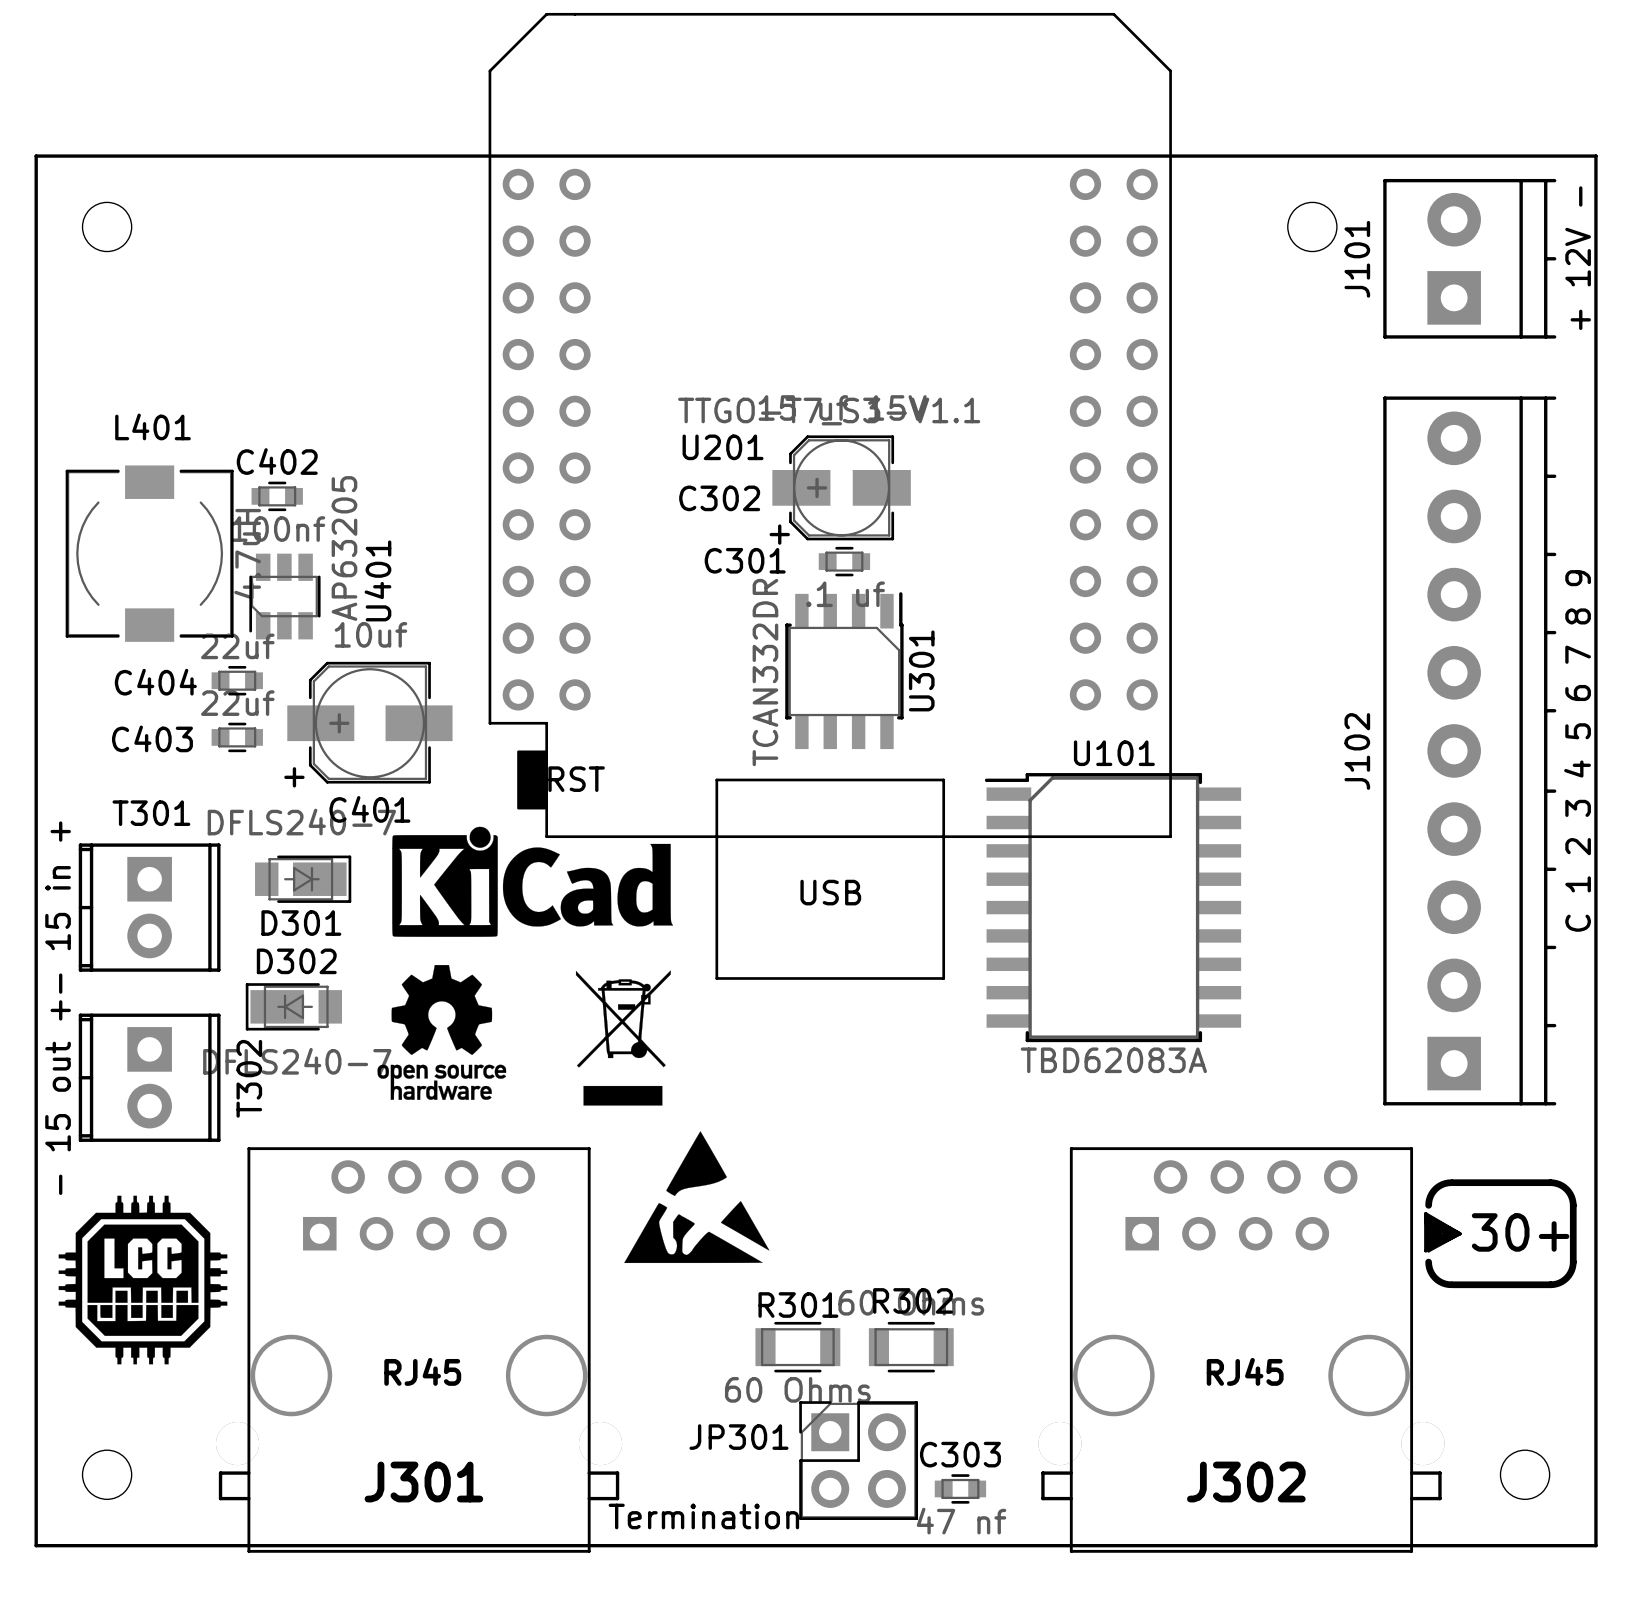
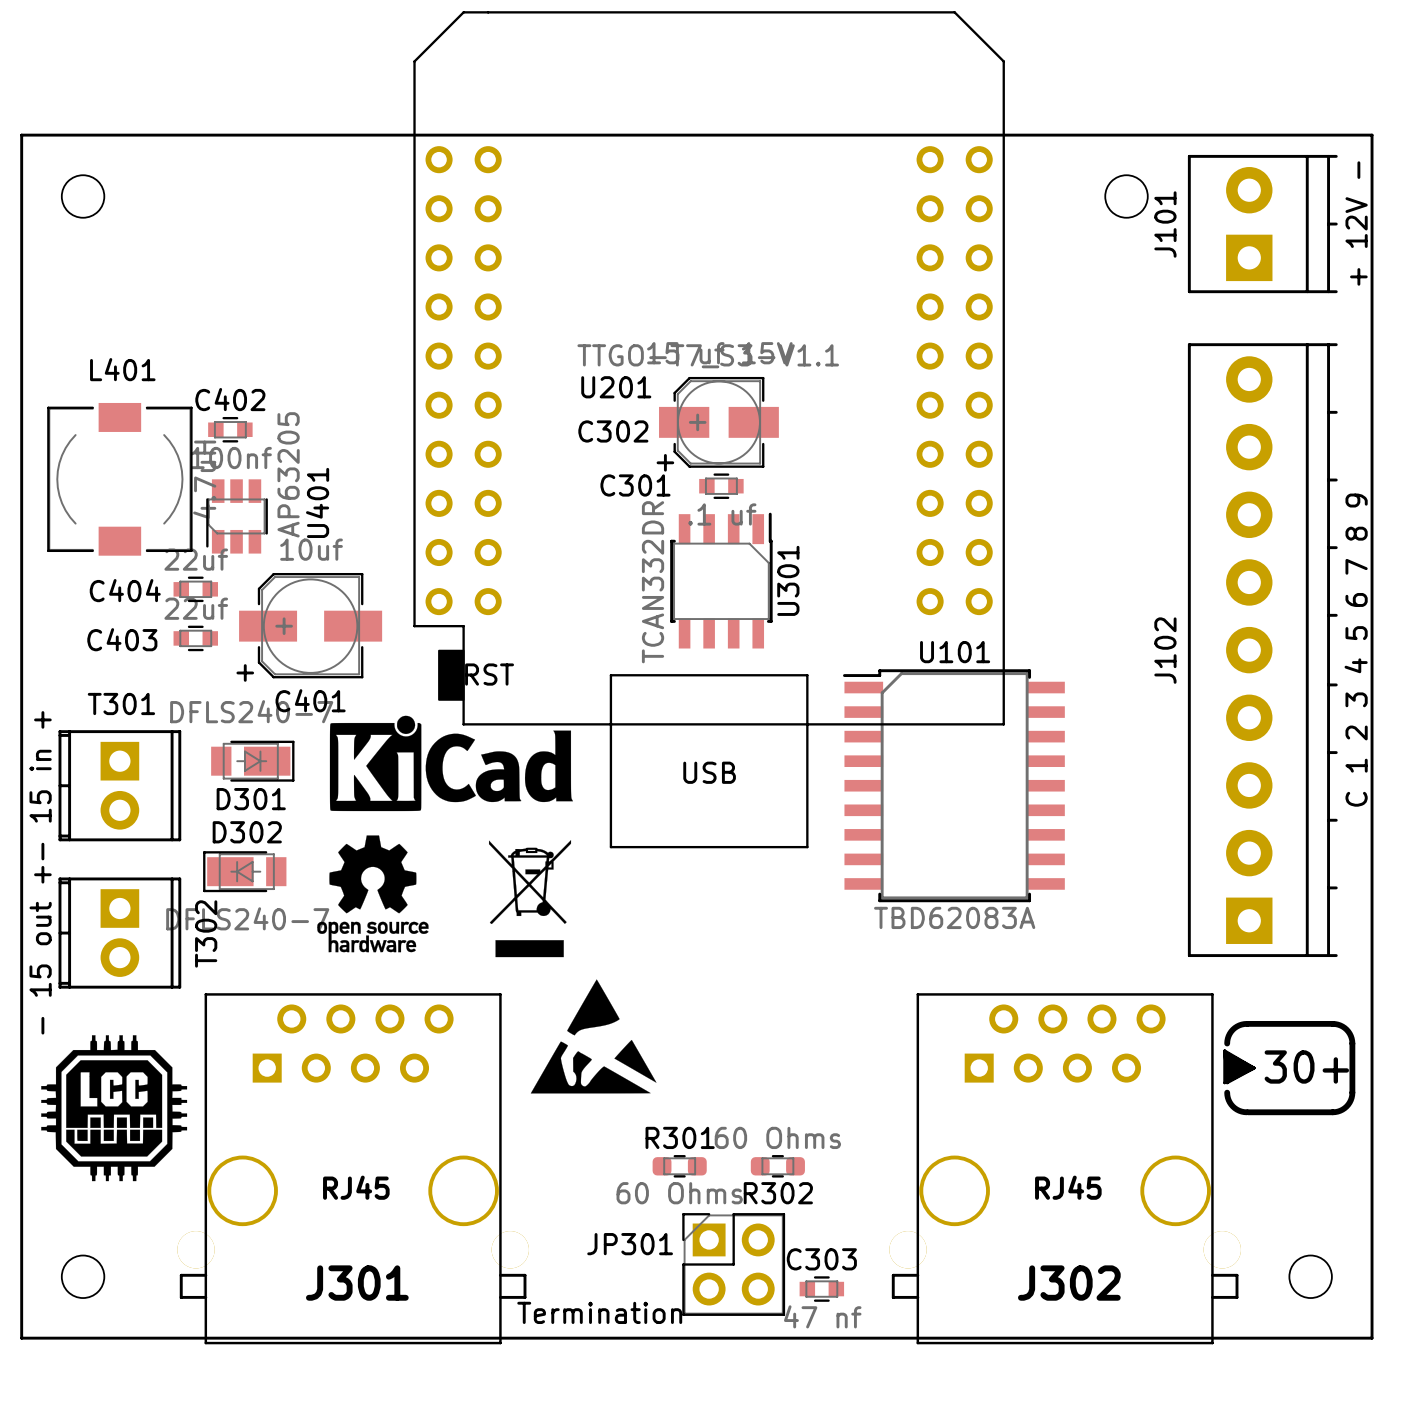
R302 name position: R302 (913, 1300) -> R302 (778, 1193)
R301 footprint: [755, 1321, 841, 1373] -> [652, 1155, 707, 1178]
R302 footprint: [868, 1321, 954, 1373] -> [750, 1155, 805, 1178]

